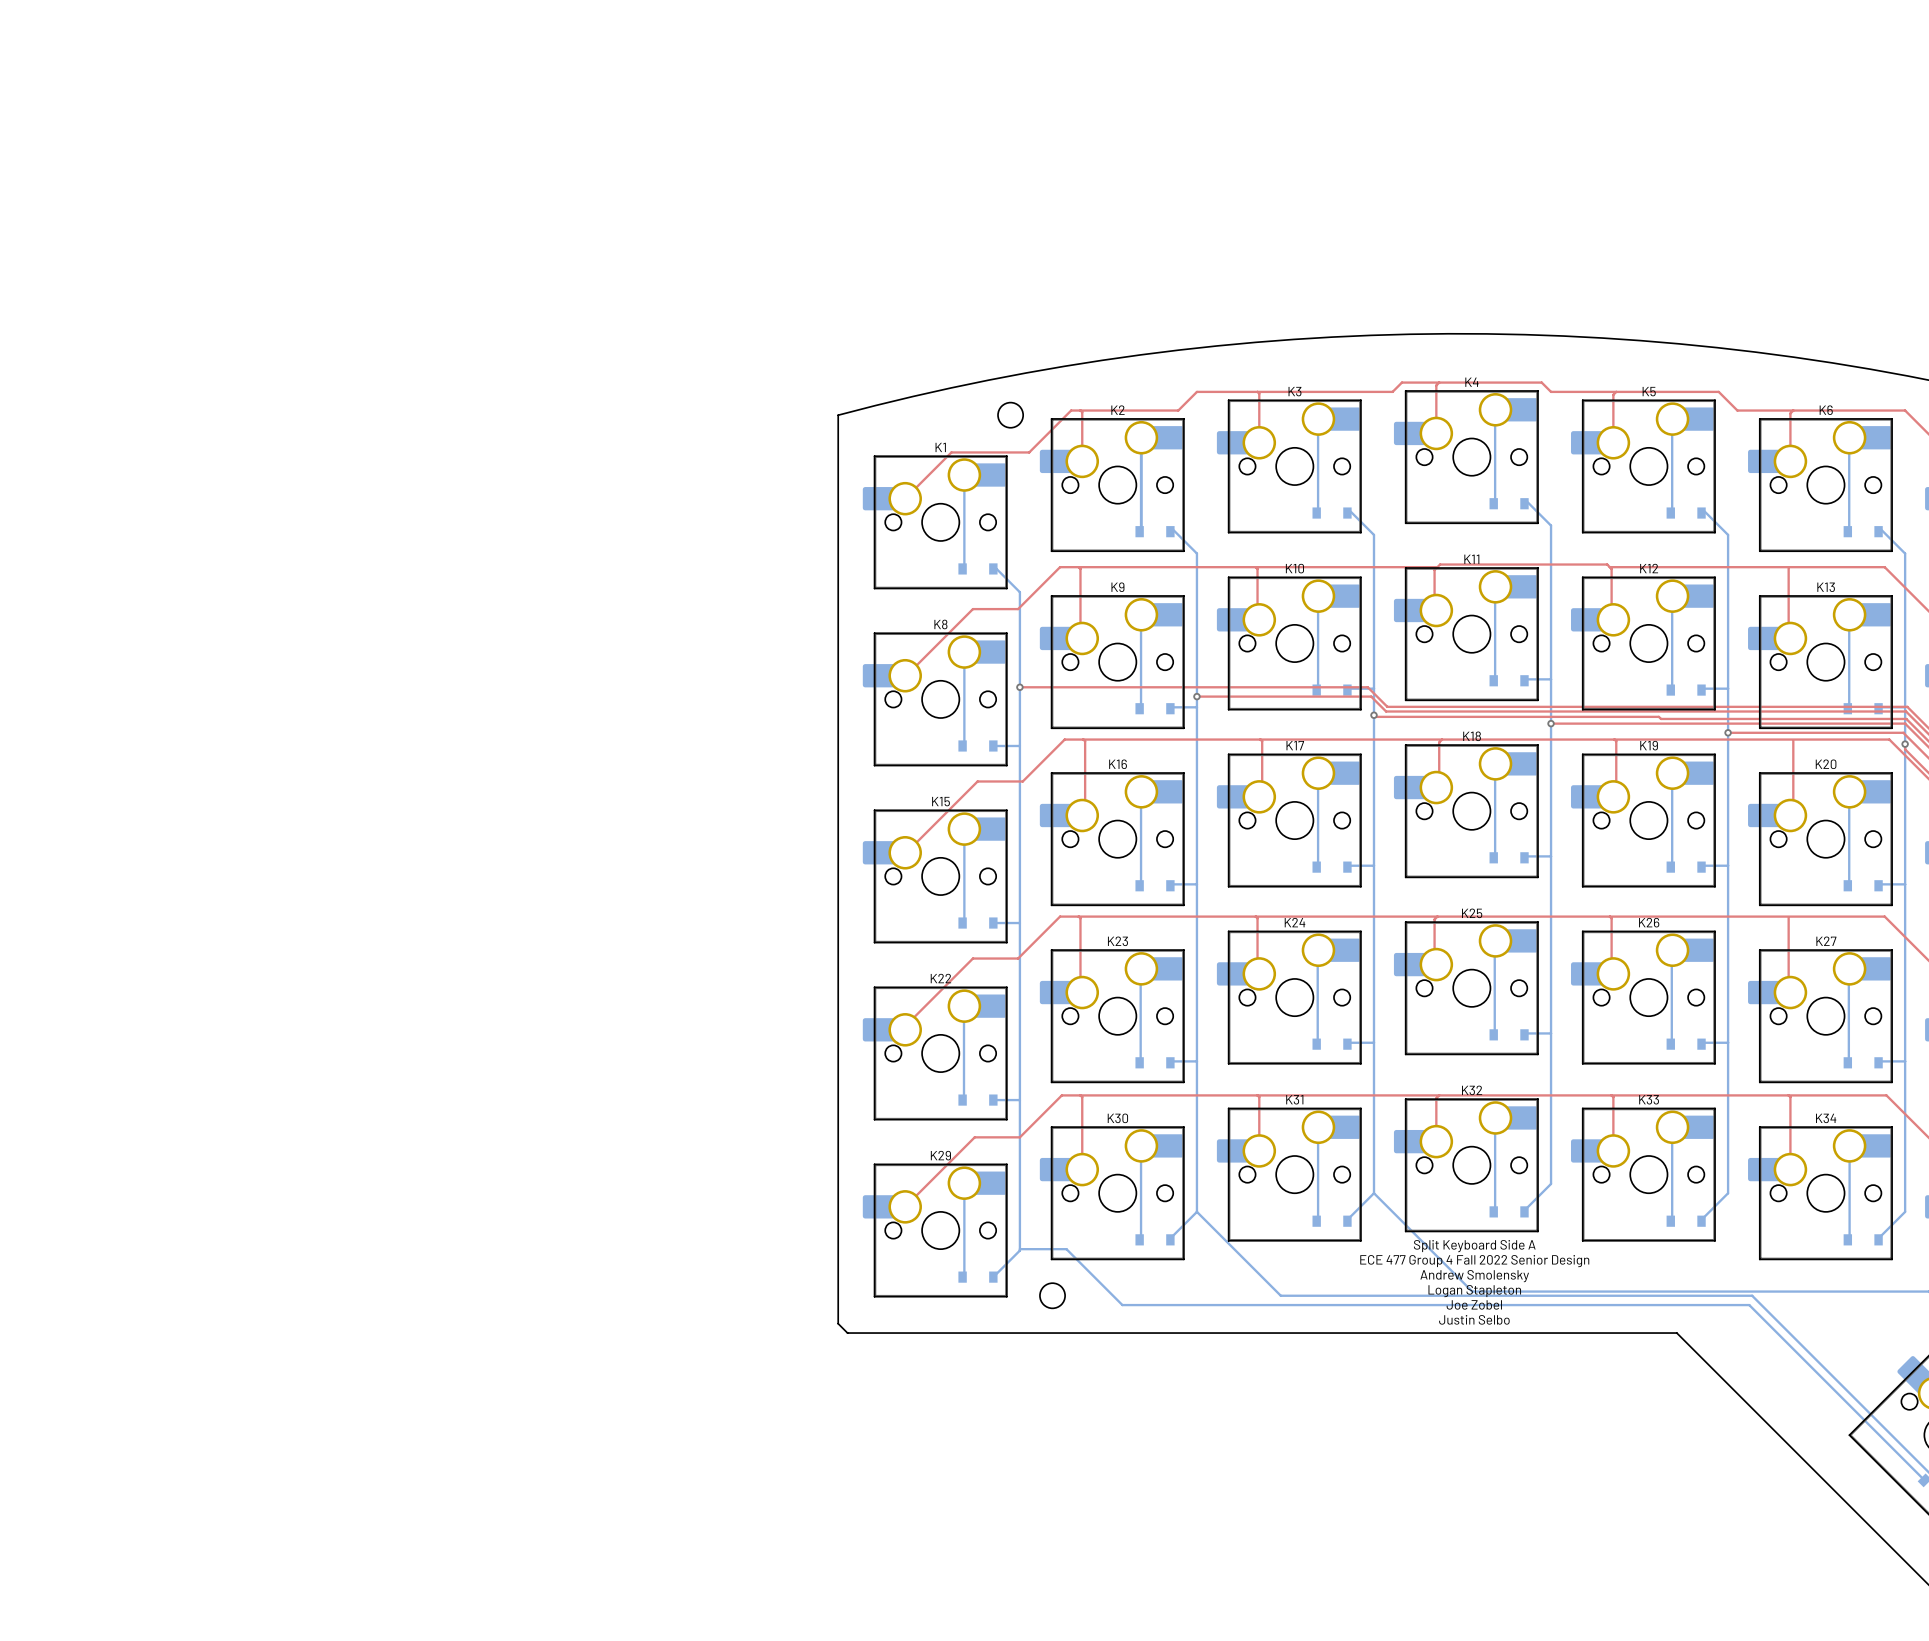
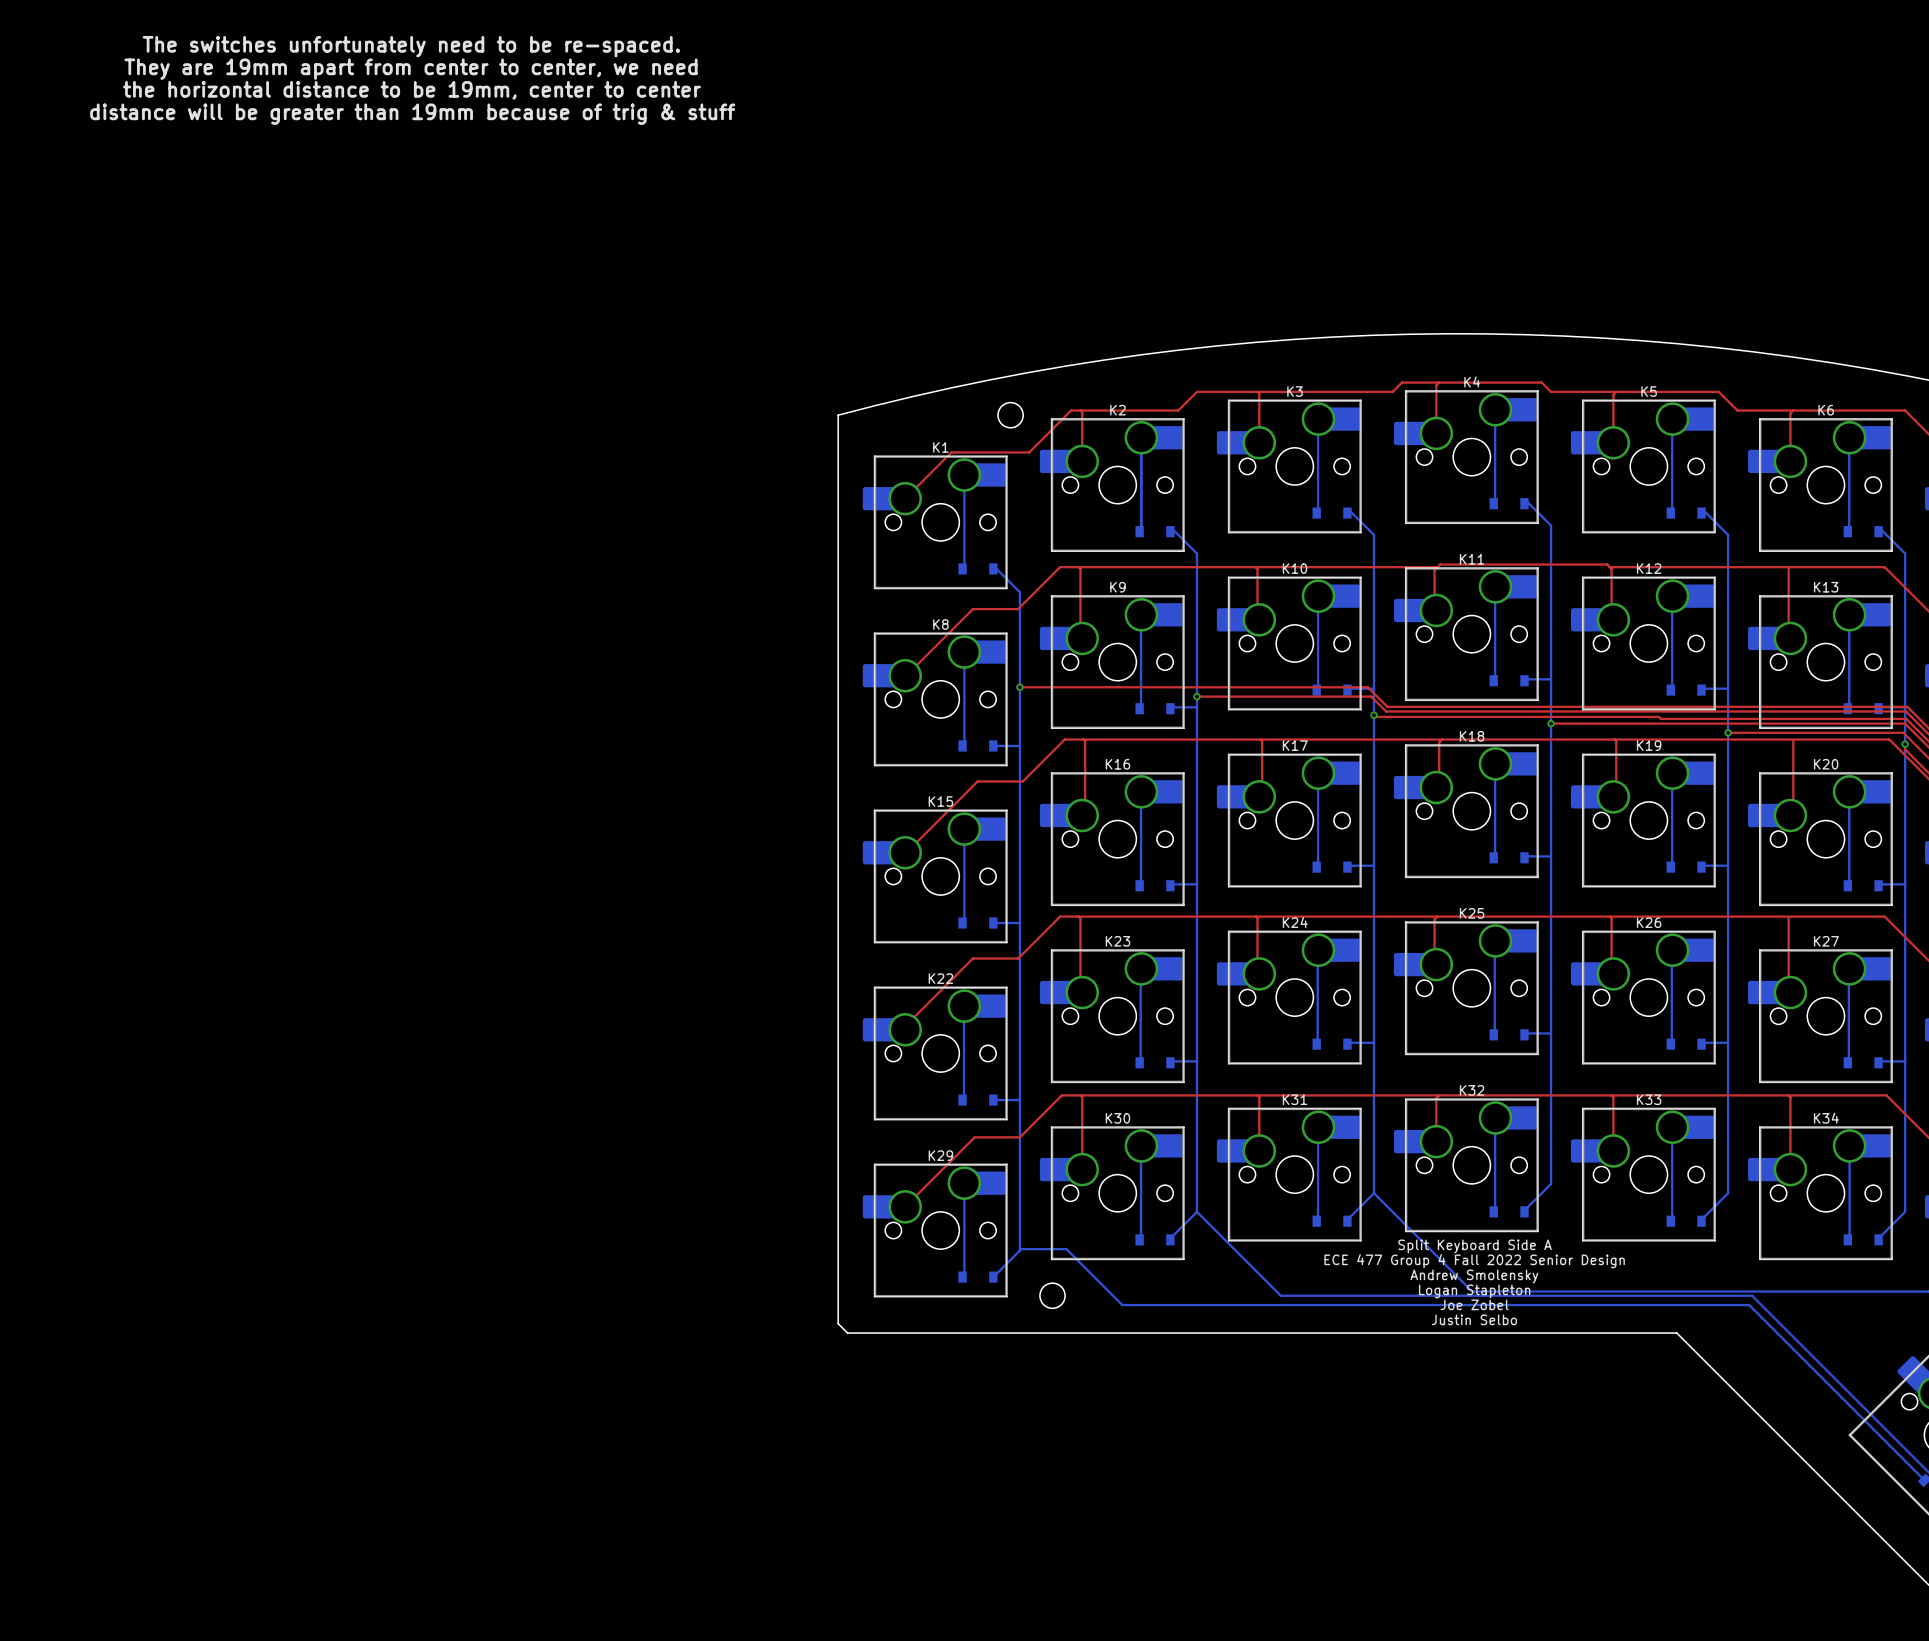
text: none -> The switches unfortunately need to be re-spaced. (411, 46)
text: none -> They are 19mm apart from center to center, we need (411, 69)
text: none -> the horizontal distance to be 19mm, center to center (412, 90)
text: none -> distance will be greater than 19mm because of trig & stuff (412, 114)

